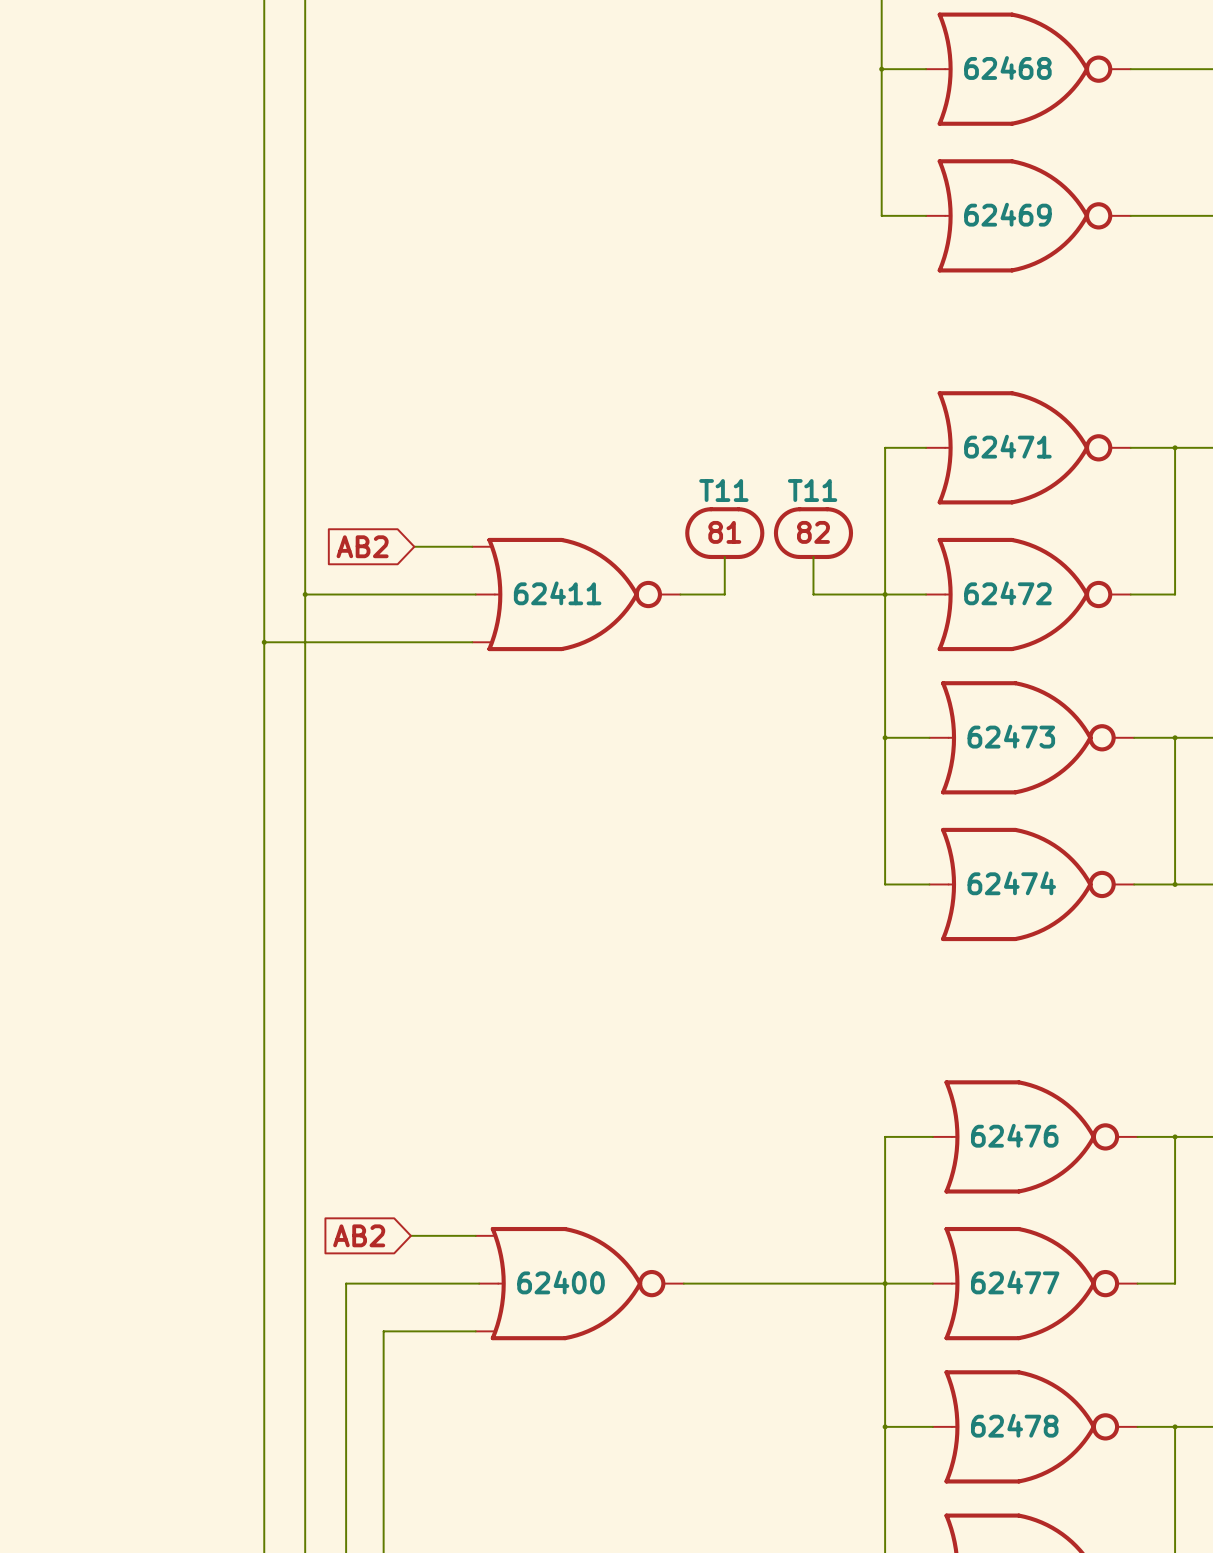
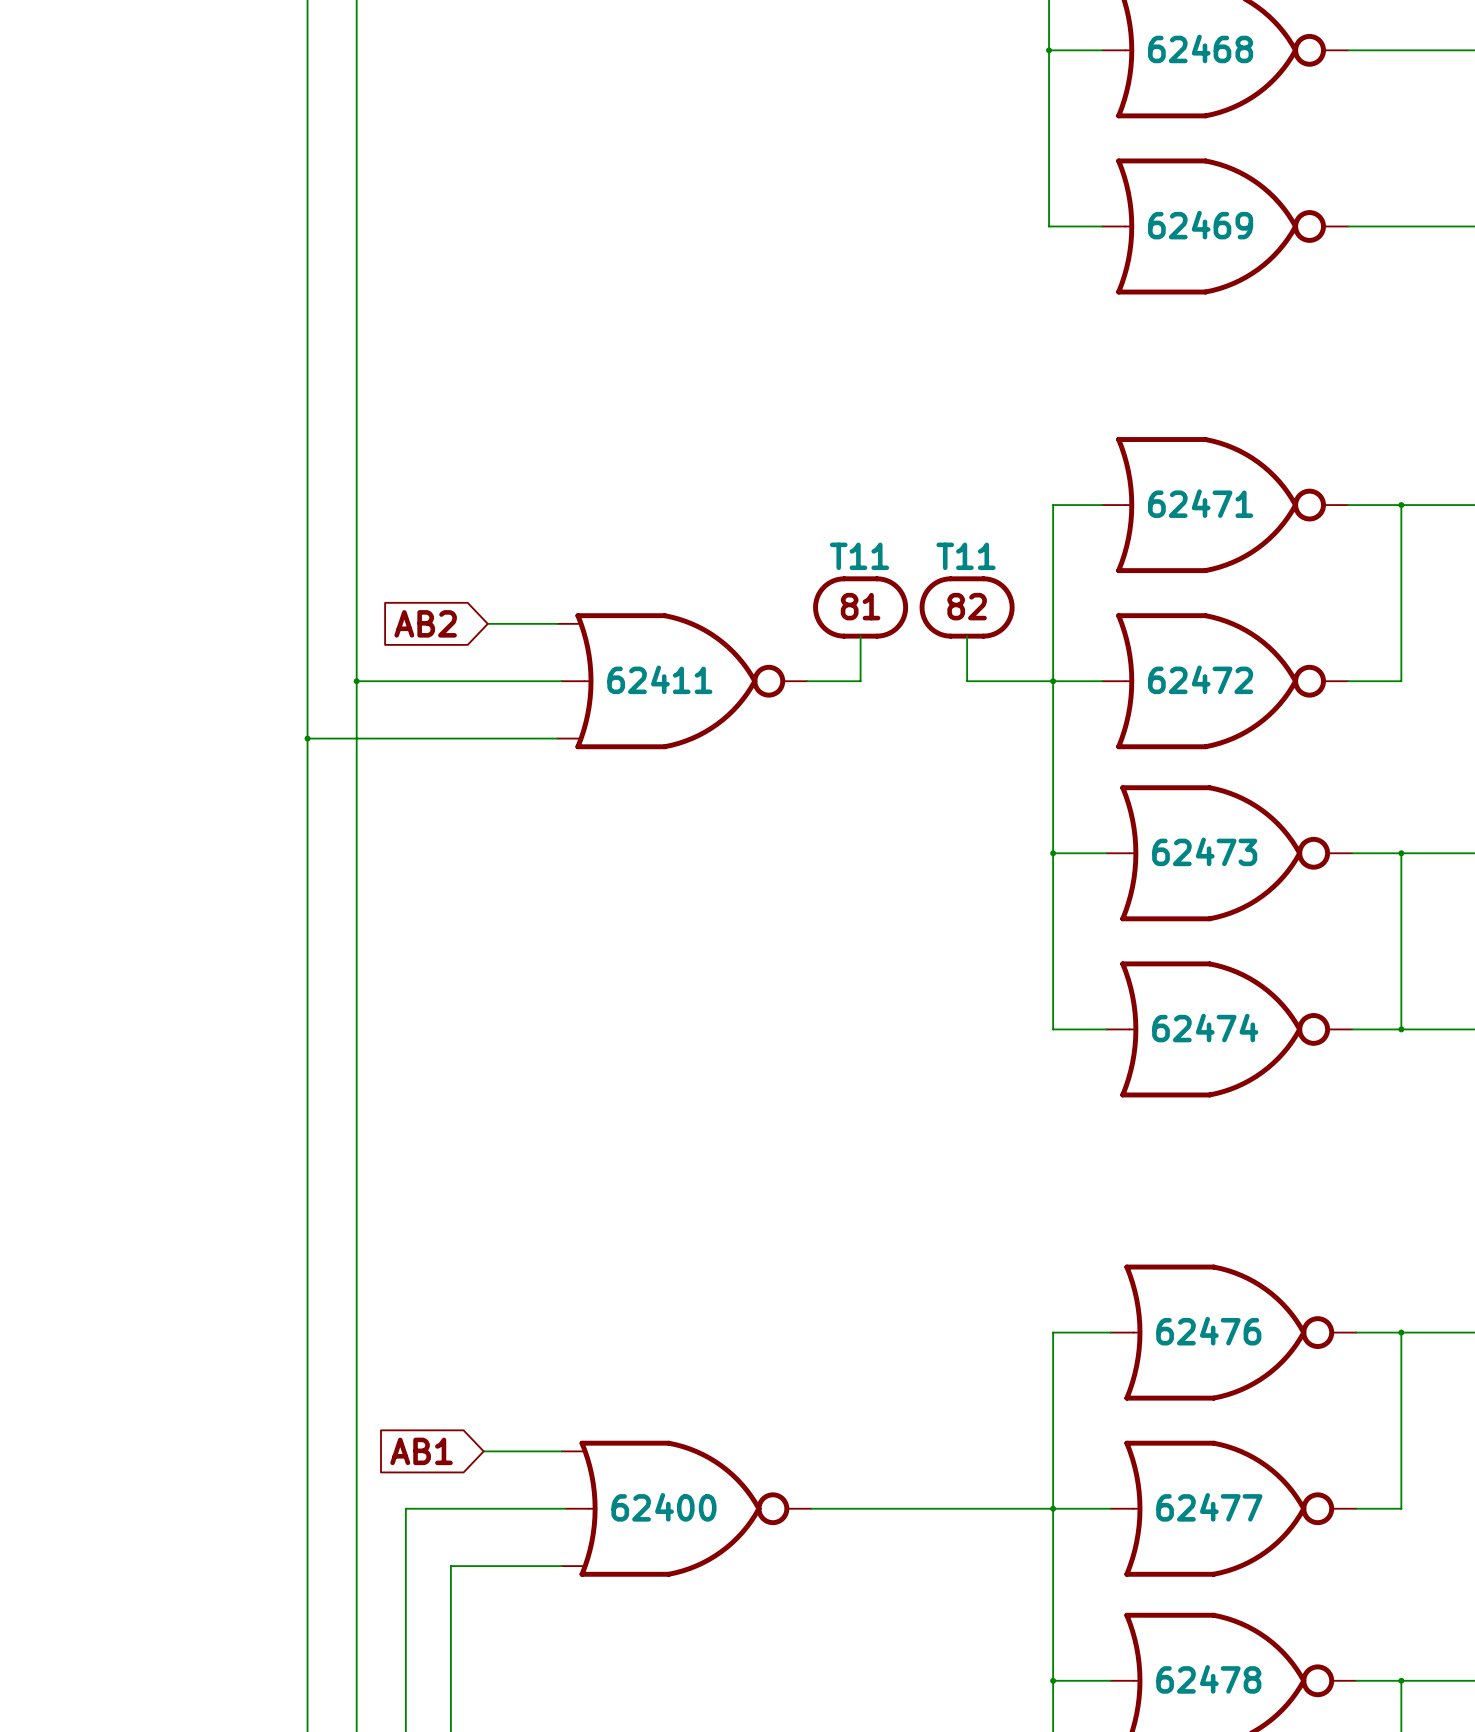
global label: AB2 (359, 1235) -> AB1 (421, 1451)

